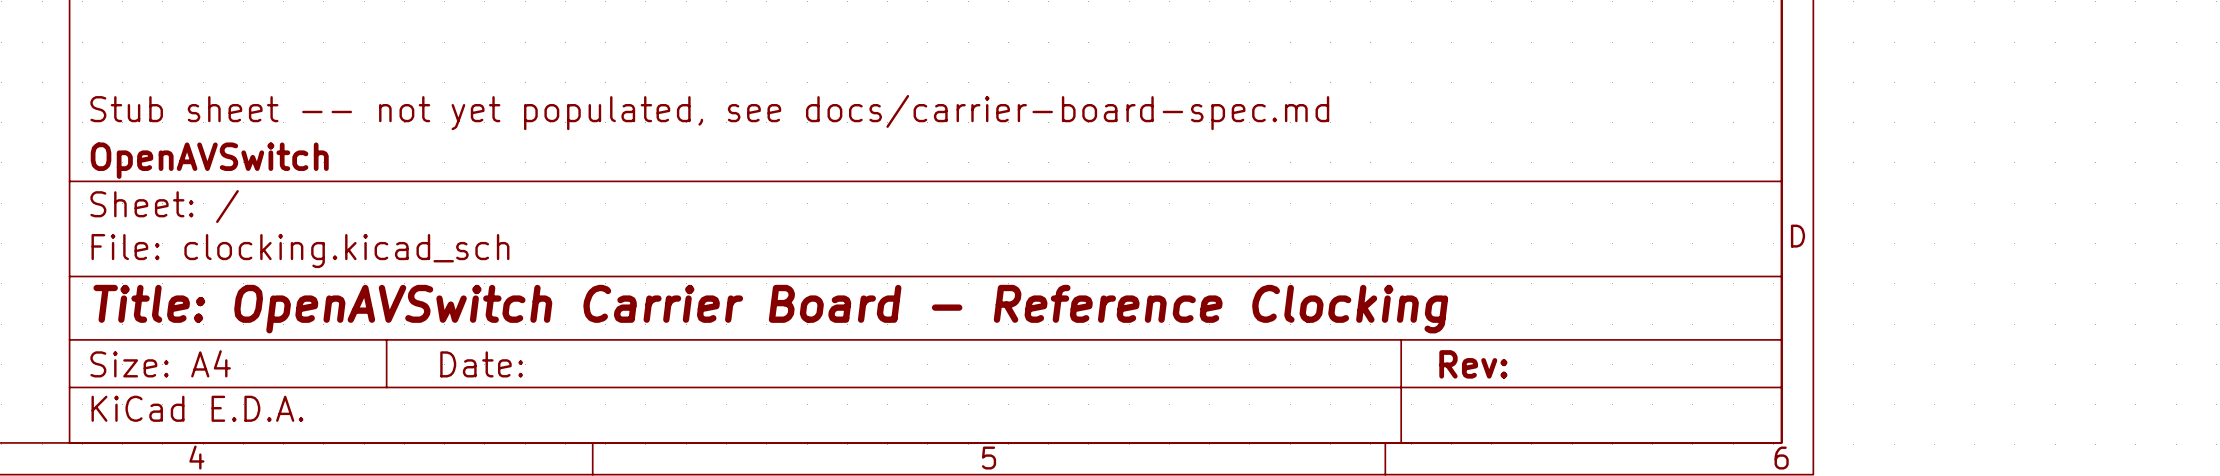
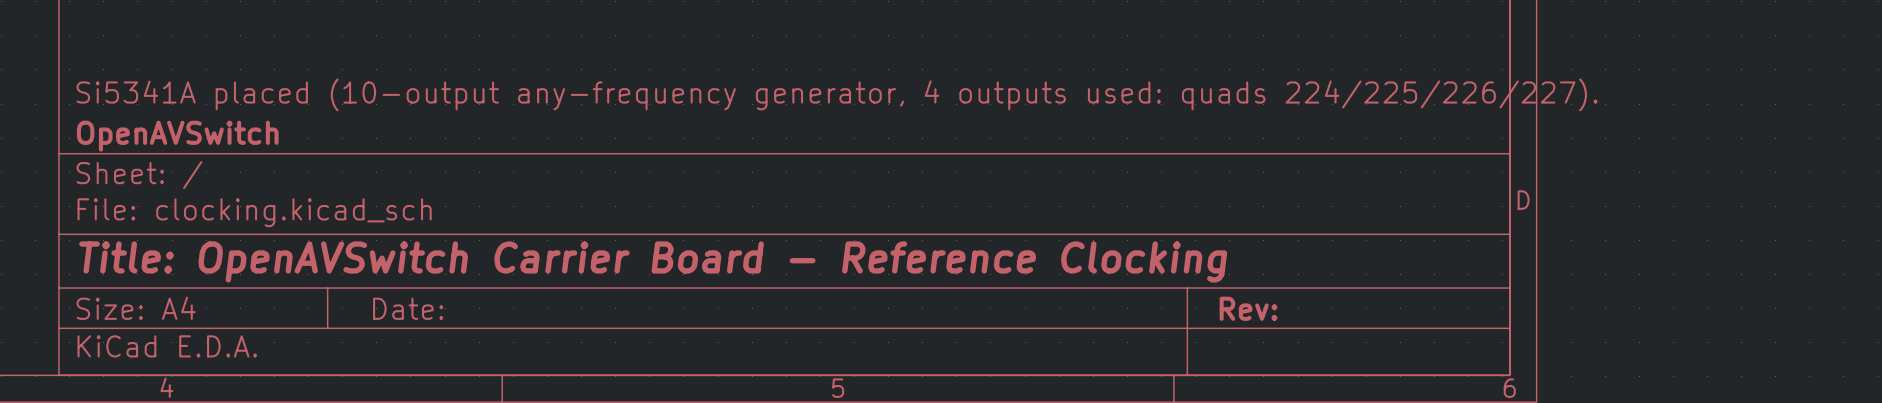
title block: Stub sheet -- not yet populated, see docs/carrier-board-spec.md (709, 112) -> Si5341A placed (10-output any-frequency generator, 4 outputs used: quads 224/225/226/227). (837, 94)

